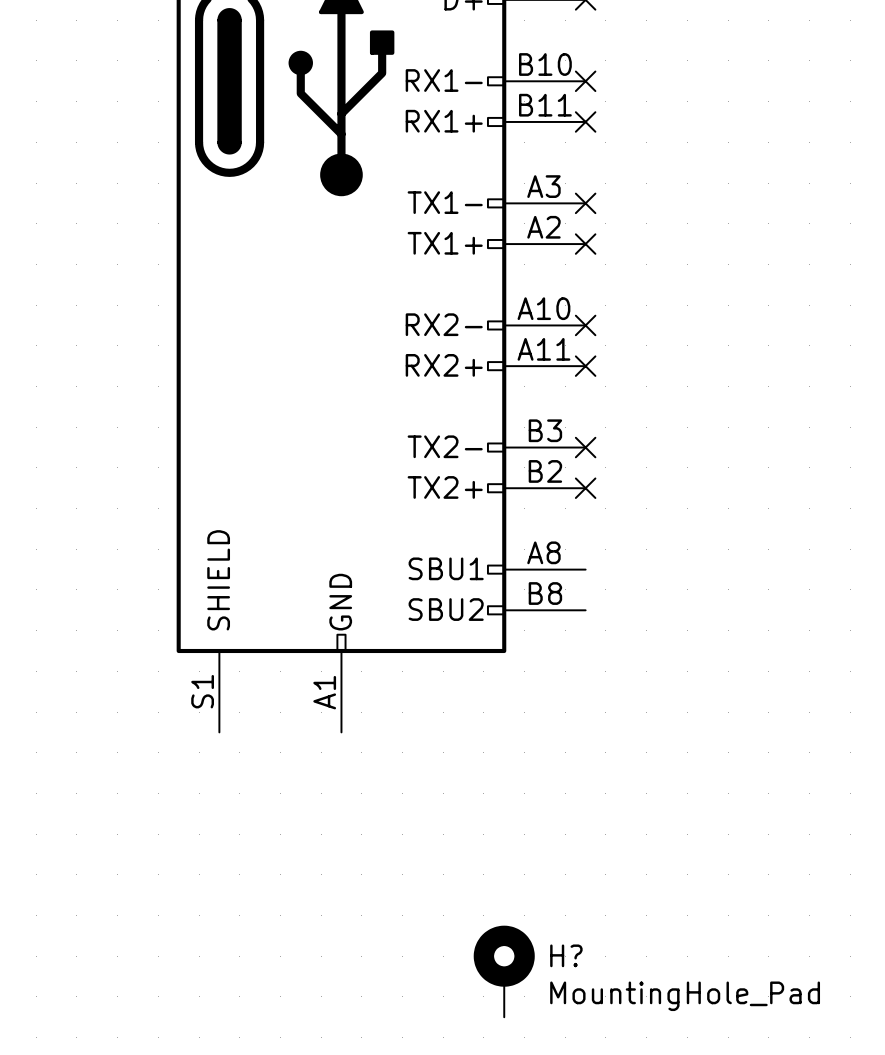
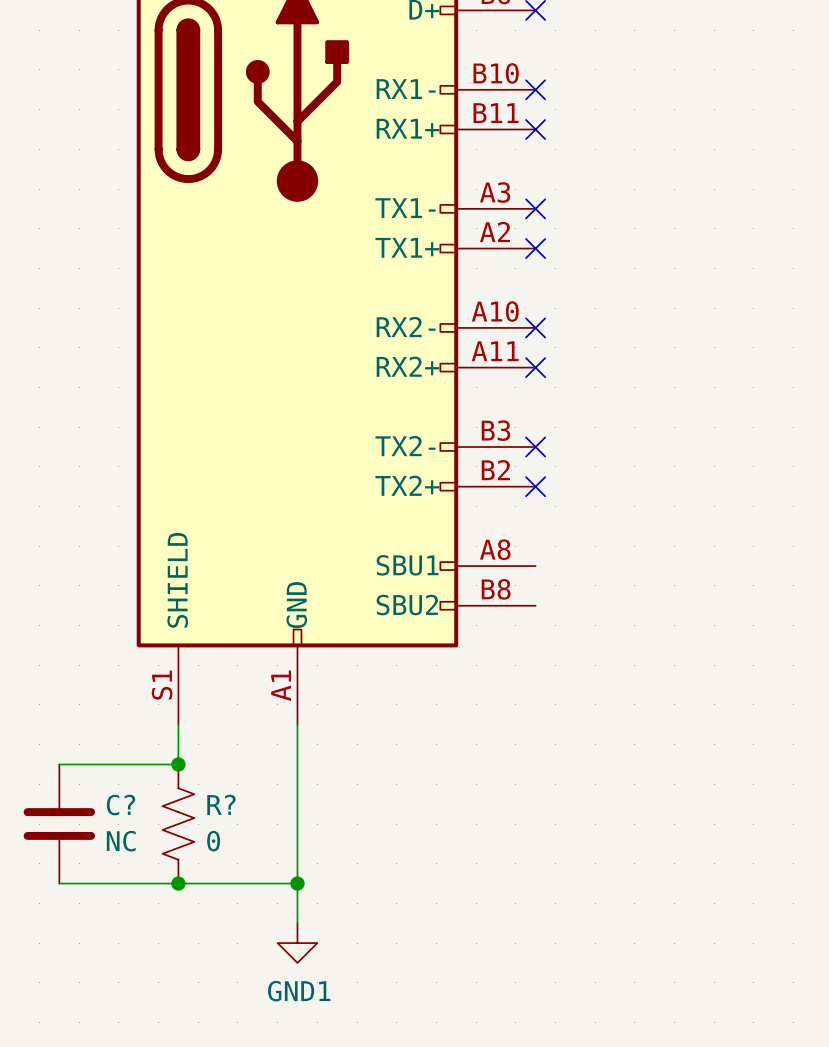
wire: none -> (178, 724) (178, 764) (59, 764)
wire: none -> (297, 724) (297, 923)
junction: none -> (178, 764)
C?: none -> NC (59, 824)
R?: none -> 0 (178, 824)
wire: none -> (59, 883) (297, 883)
junction: none -> (178, 883)
junction: none -> (297, 883)
power symbol: none -> GND1 (297, 943)
H?: MountingHole_Pad (504, 971) -> none

